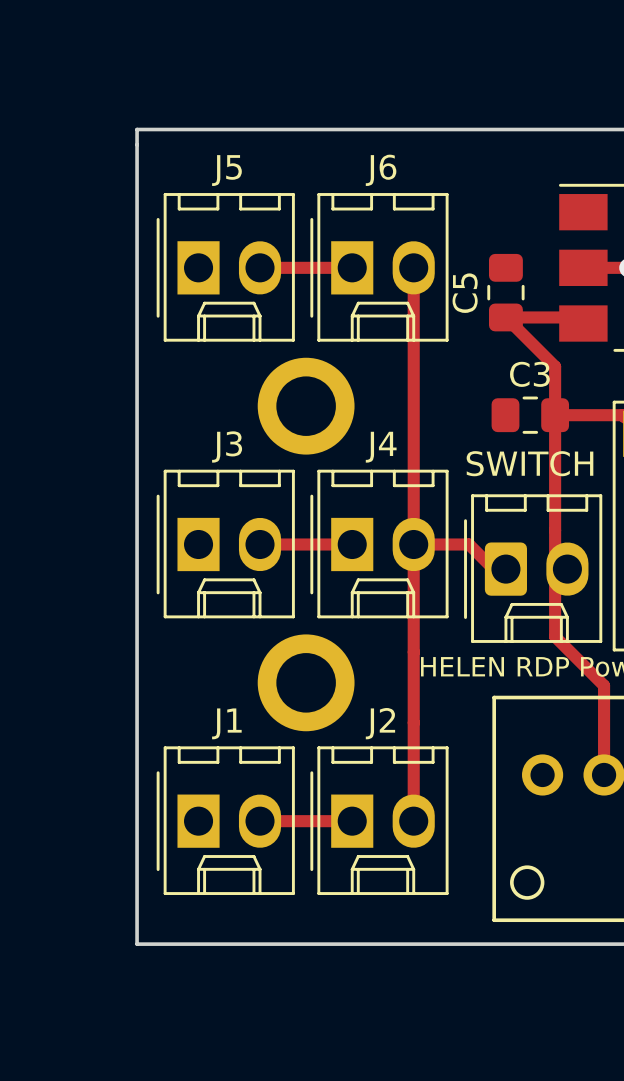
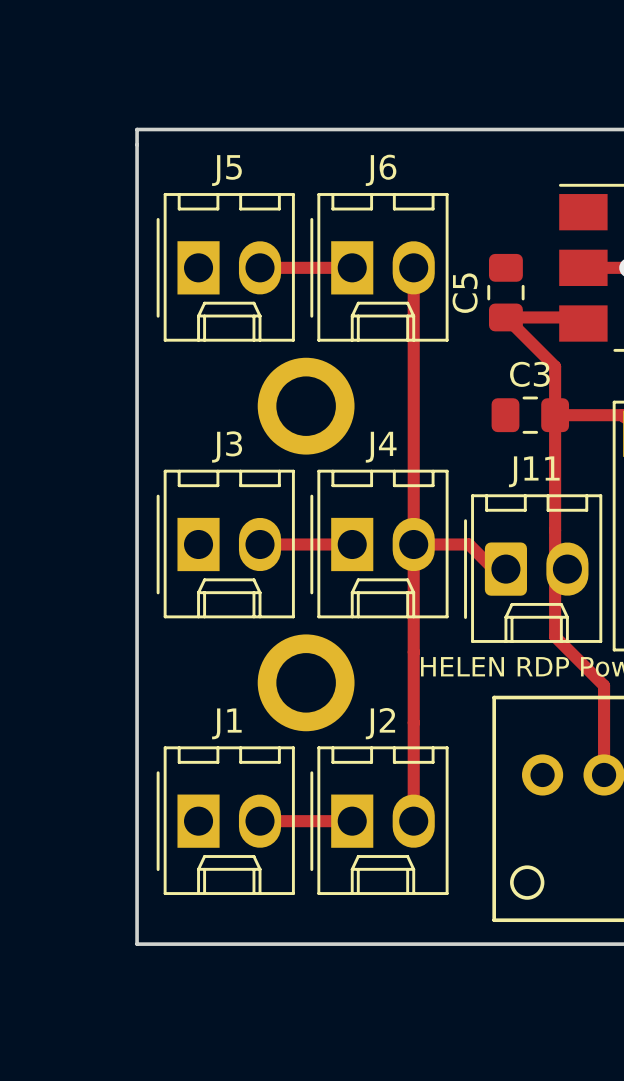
text: SWITCH (529, 463) -> none
J11 name: none -> J11 (534, 471)

